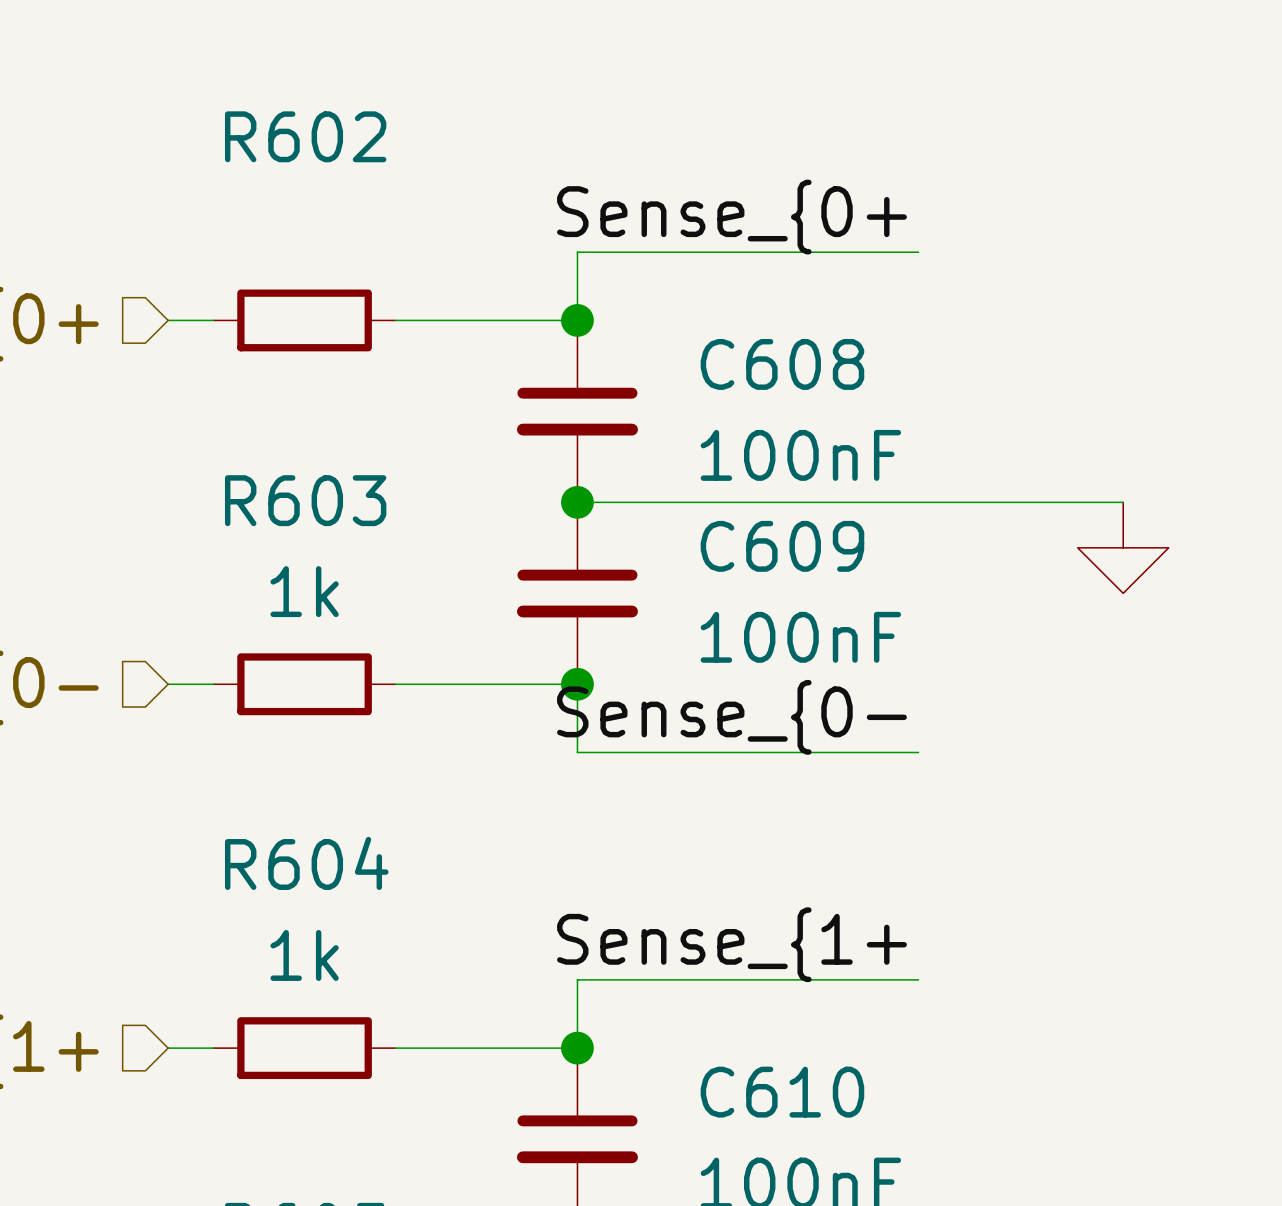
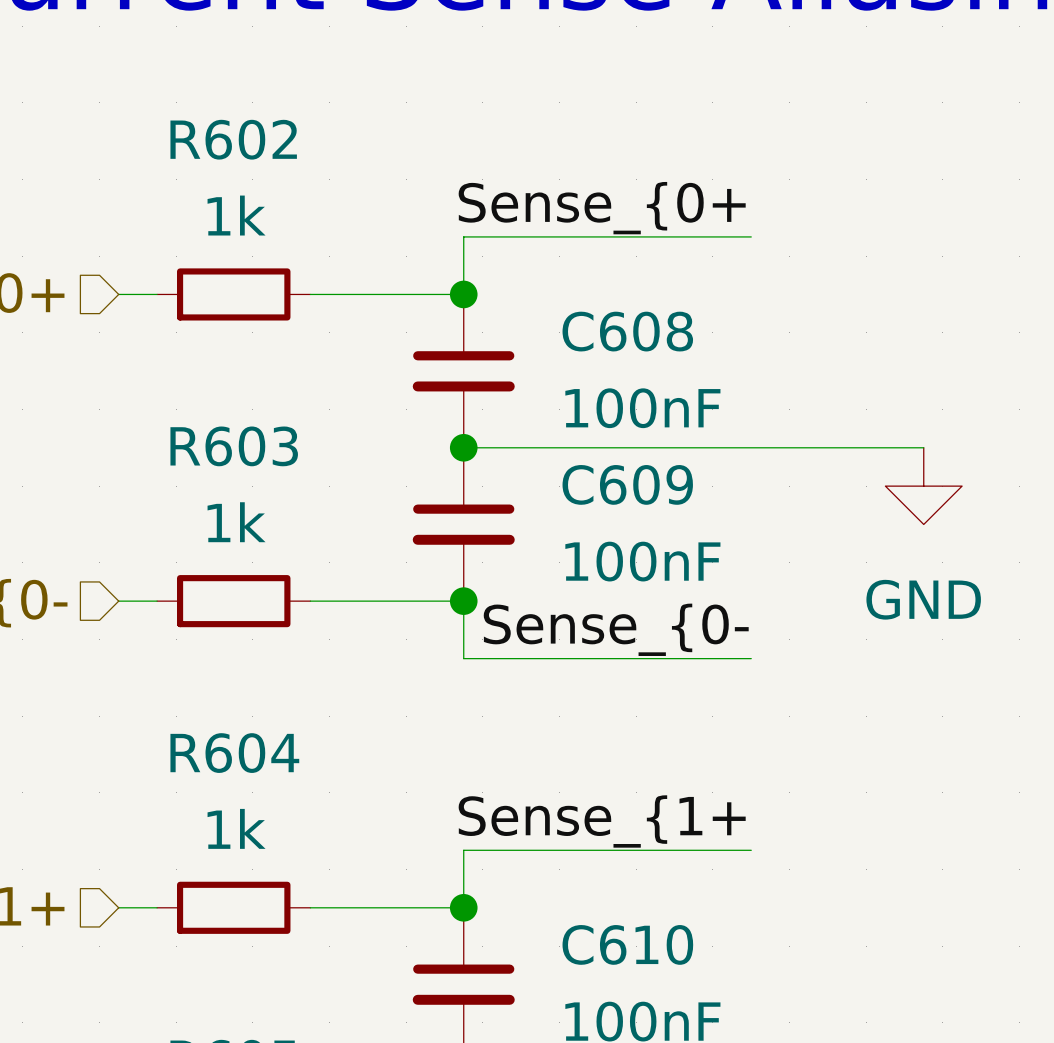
R602 value: none -> 1k (236, 215)
power symbol text: none -> GND (923, 599)

